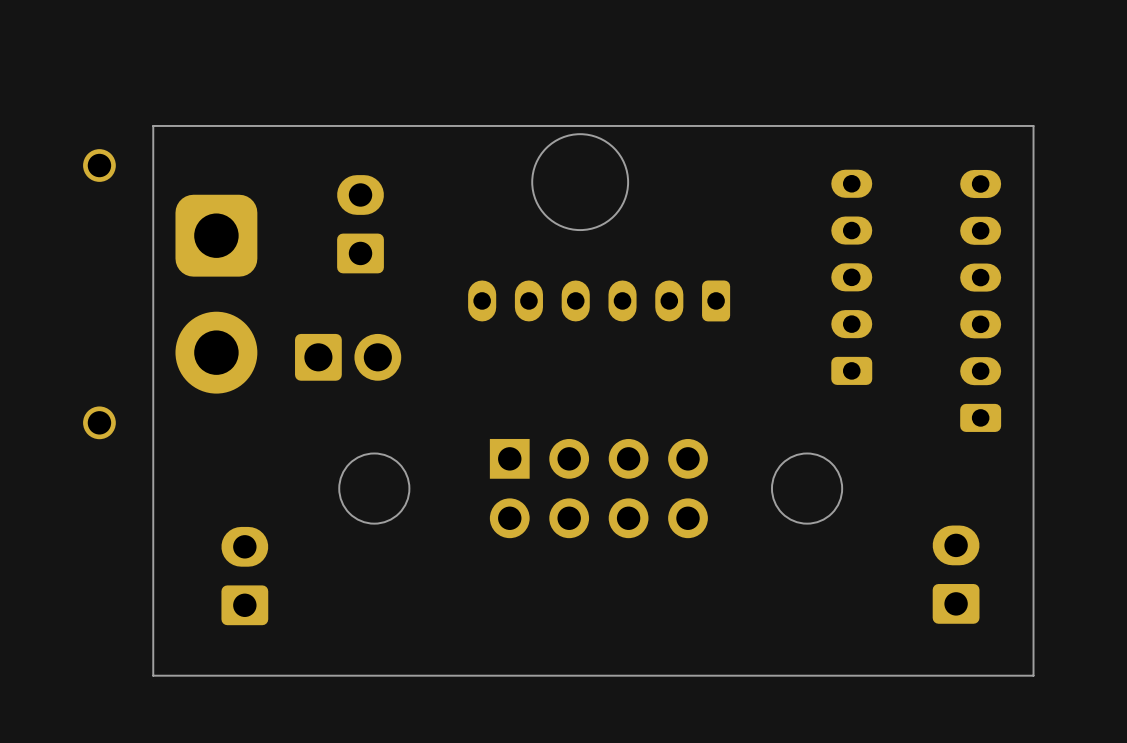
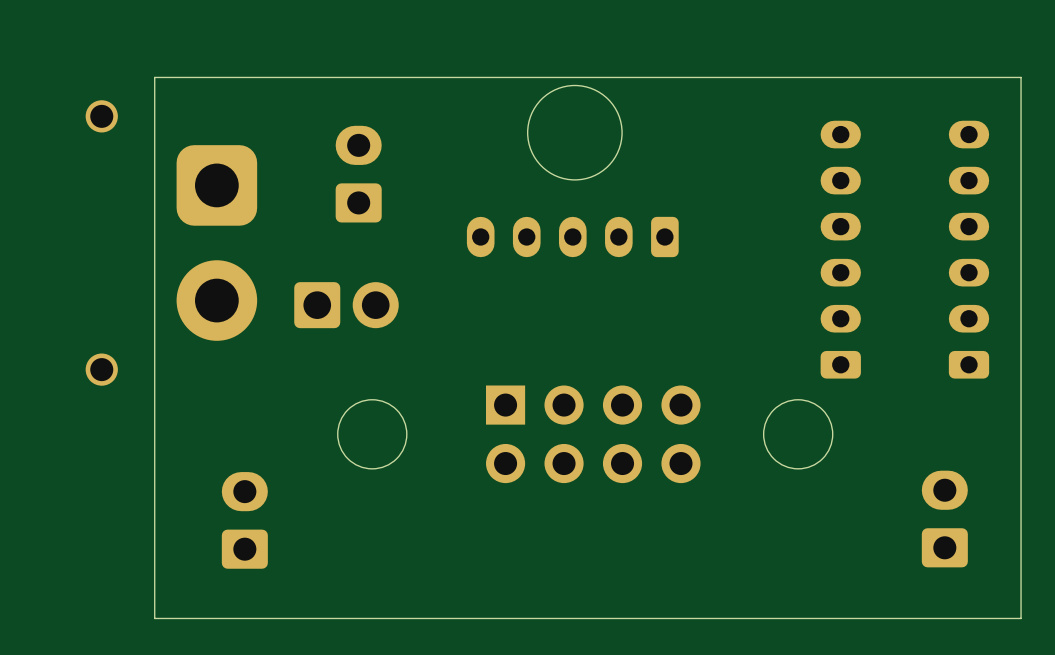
part rotation: 0° (851, 277) -> 90° counterclockwise (572, 237)
part position: (851, 277) -> (572, 237)
part rotation: 0° (599, 300) -> 90° clockwise (840, 249)
part position: (599, 300) -> (840, 249)

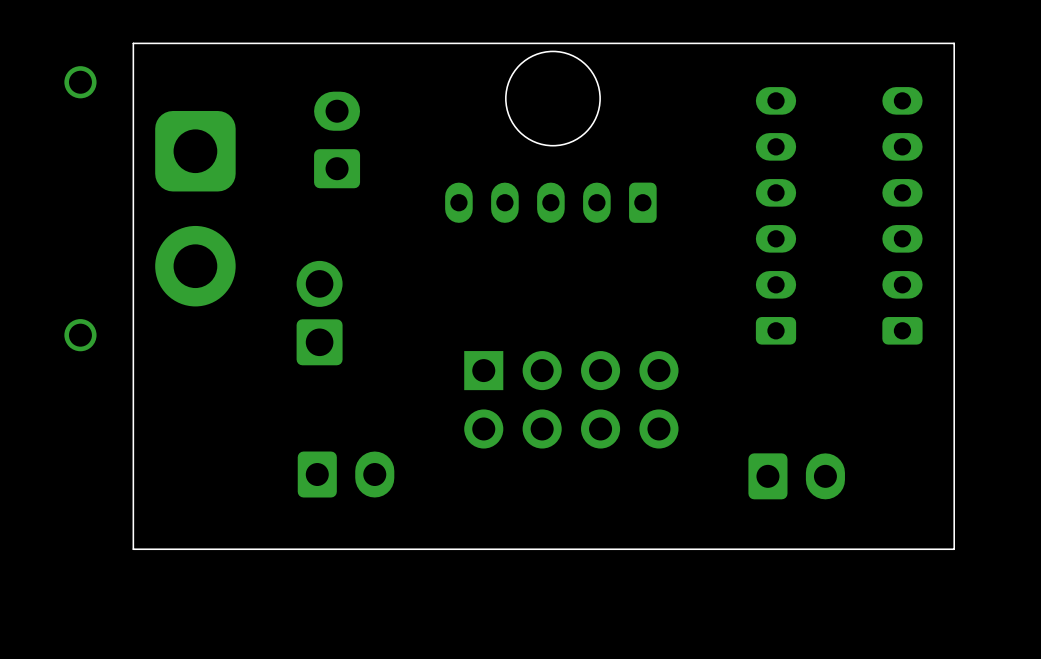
board edge: (976, 77) (1021, 77) (1021, 618) (154, 618) (154, 583) -> (954, 43) (954, 549) (133, 549)
part: (840, 249) -> none
part: (969, 249) -> none
part: none -> (776, 215)
part: none -> (902, 215)
part rotation: 0° (346, 305) -> 90° counterclockwise (319, 313)
round board edge: [337, 399, 408, 470] -> none
round board edge: [763, 399, 834, 470] -> none
part rotation: 0° (944, 519) -> 90° clockwise (796, 476)
part position: (944, 519) -> (796, 476)
part rotation: 0° (244, 520) -> 90° clockwise (346, 474)
part position: (244, 520) -> (346, 474)

